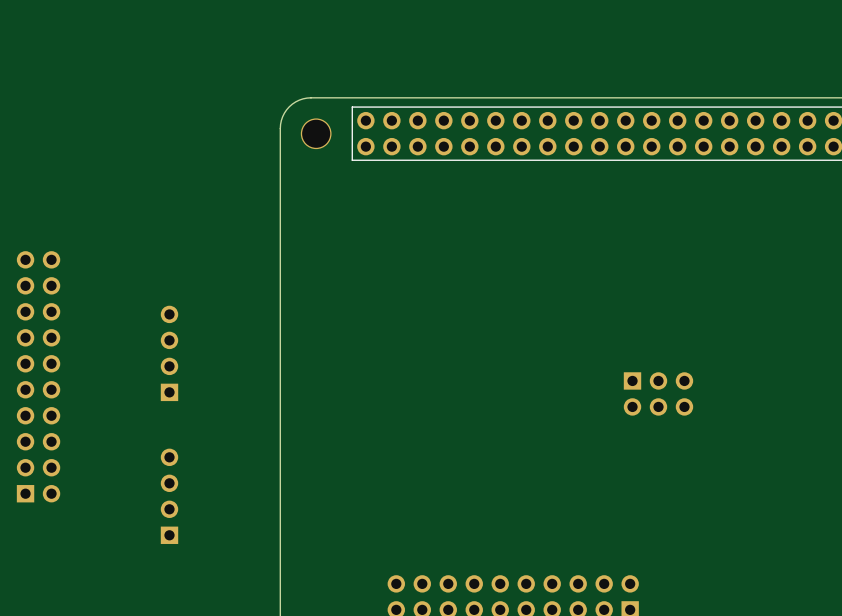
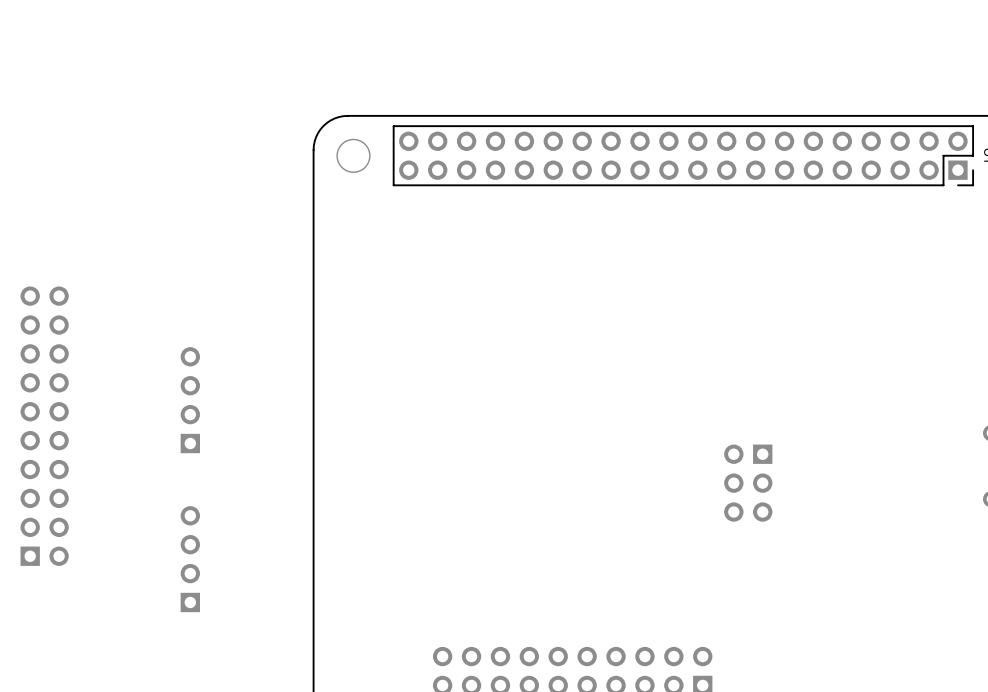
part rotation: 0° (658, 393) -> 90° clockwise (748, 483)

